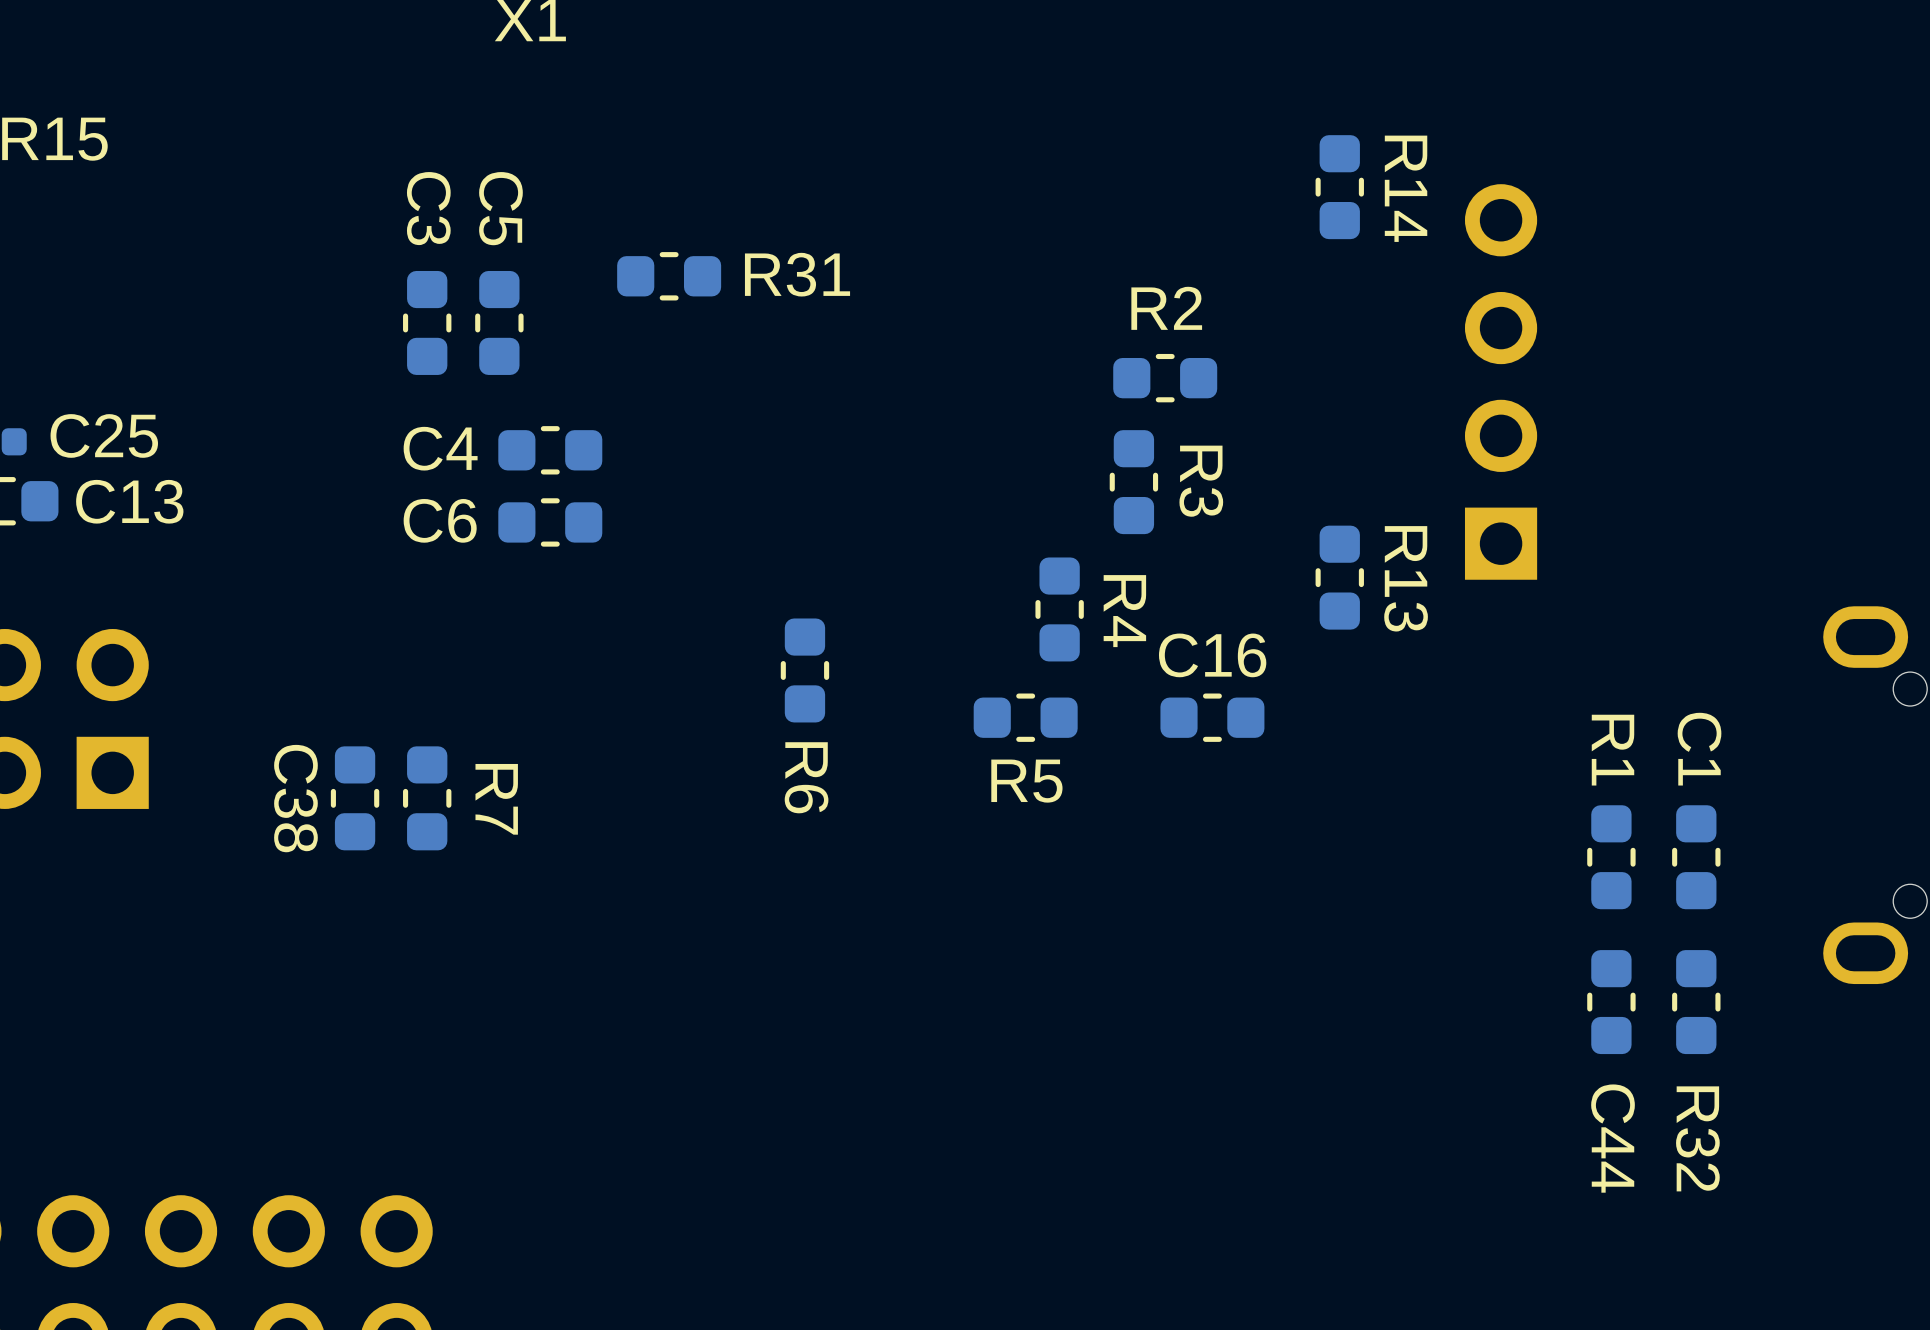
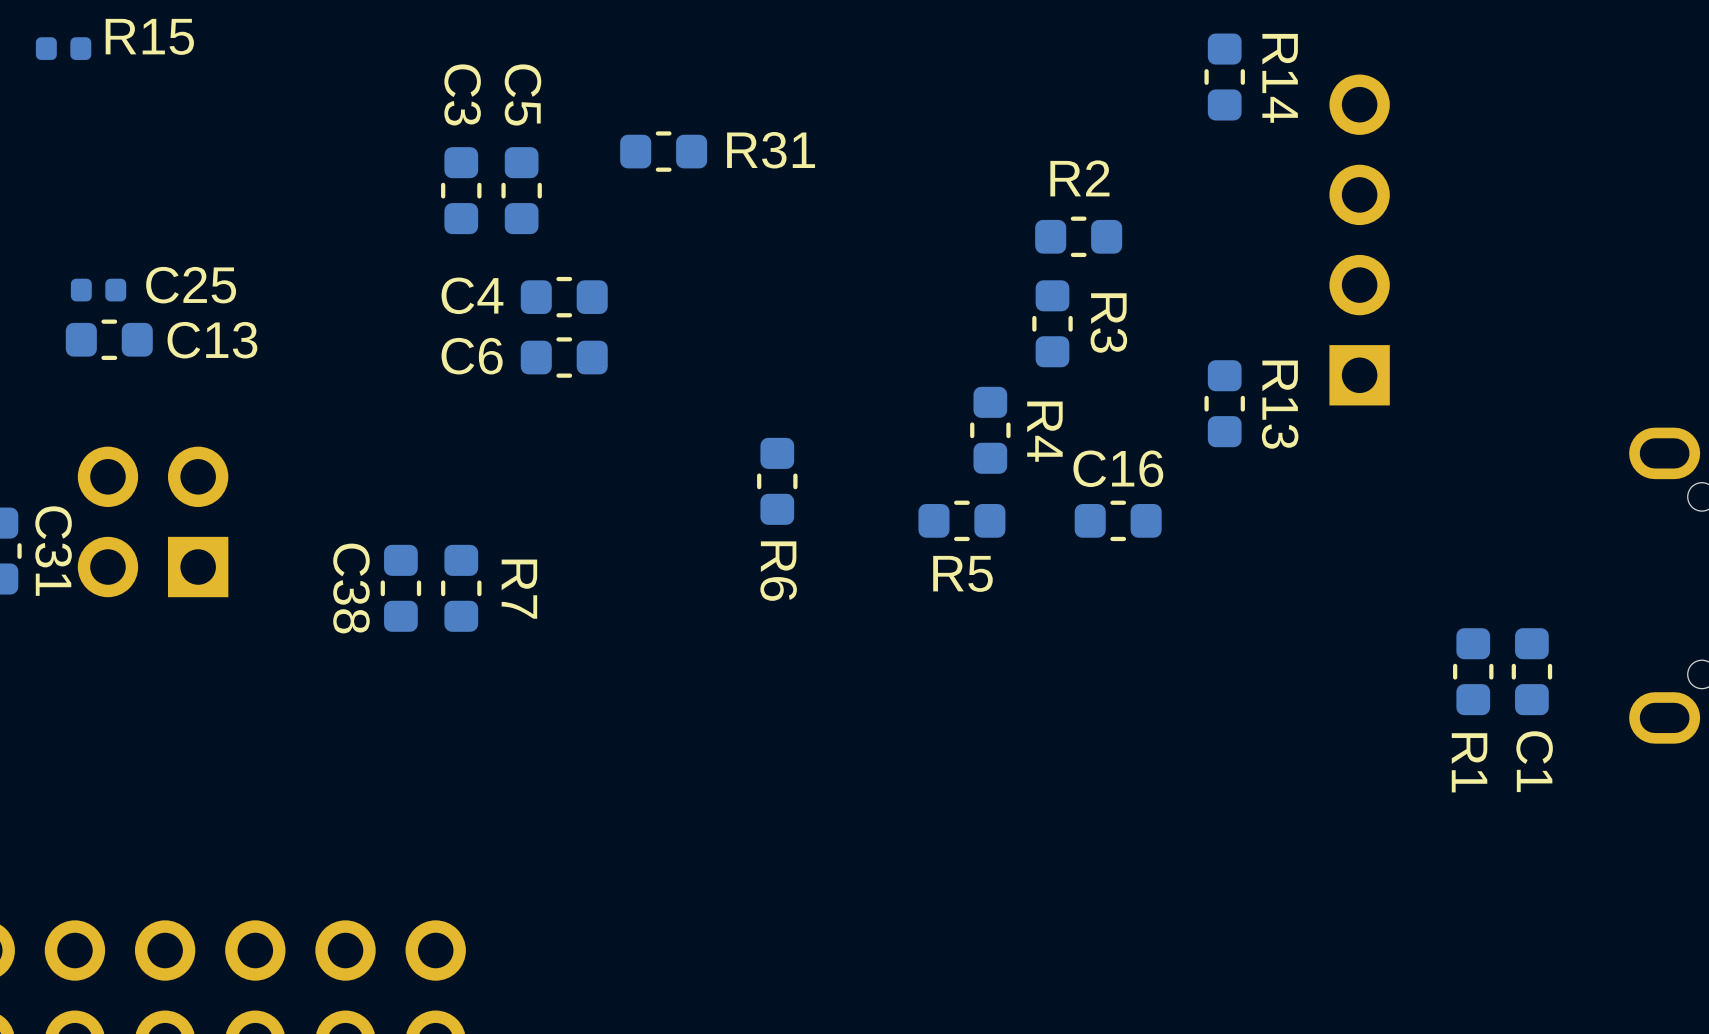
C1 name position: C1 (1699, 749) -> C1 (1534, 761)
R1 name position: R1 (1612, 750) -> R1 (1469, 762)
R1 position: (1611, 857) -> (1473, 671)
C1 position: (1696, 857) -> (1531, 671)
C44: (1611, 1002) -> none
R32: (1696, 1002) -> none

